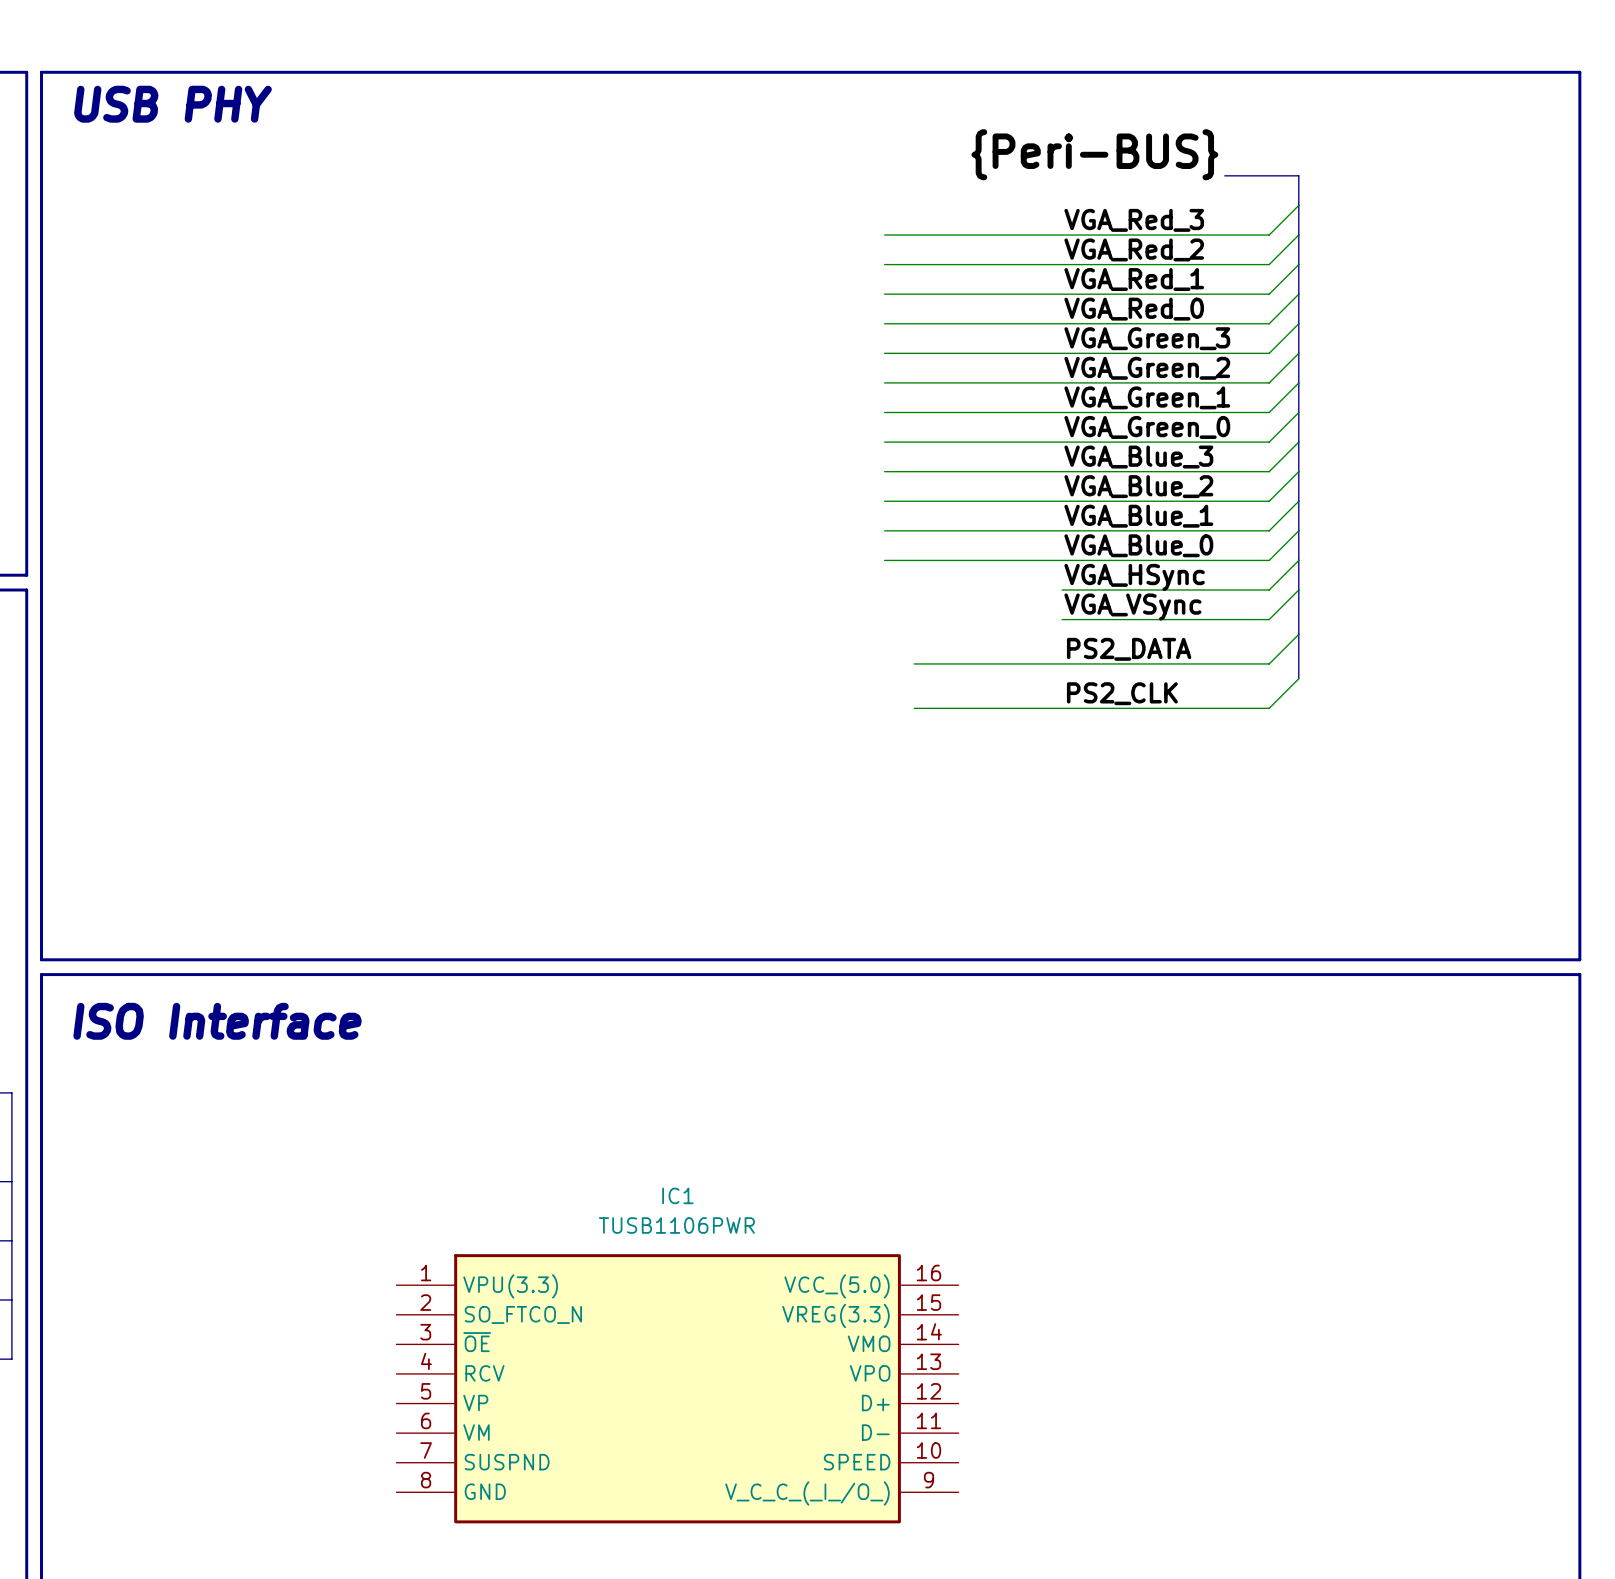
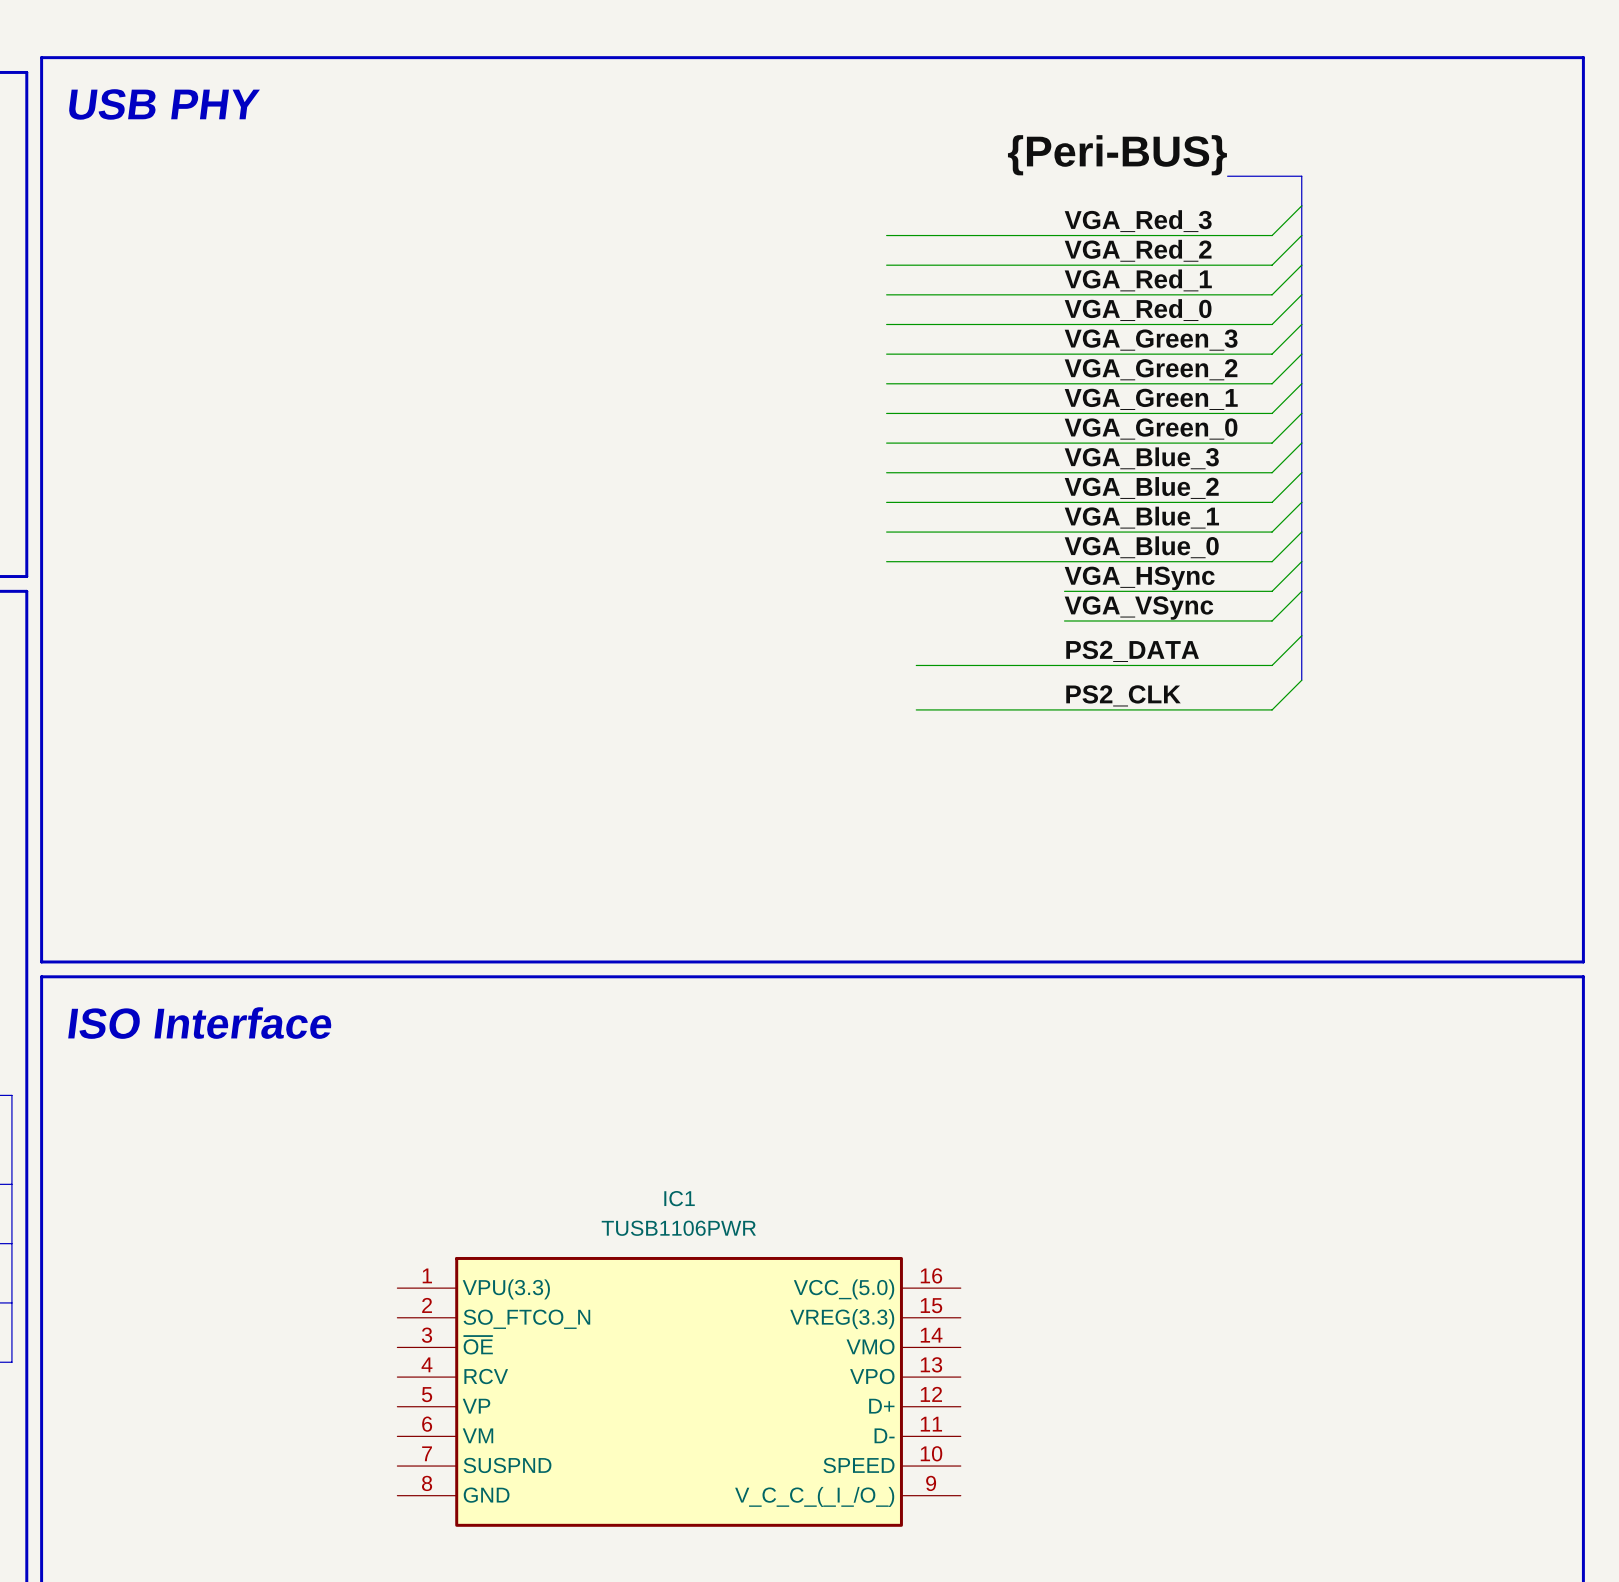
line: (41, 72) (1579, 72) -> (41, 72) (41, 57) (1583, 57) (1583, 72)

